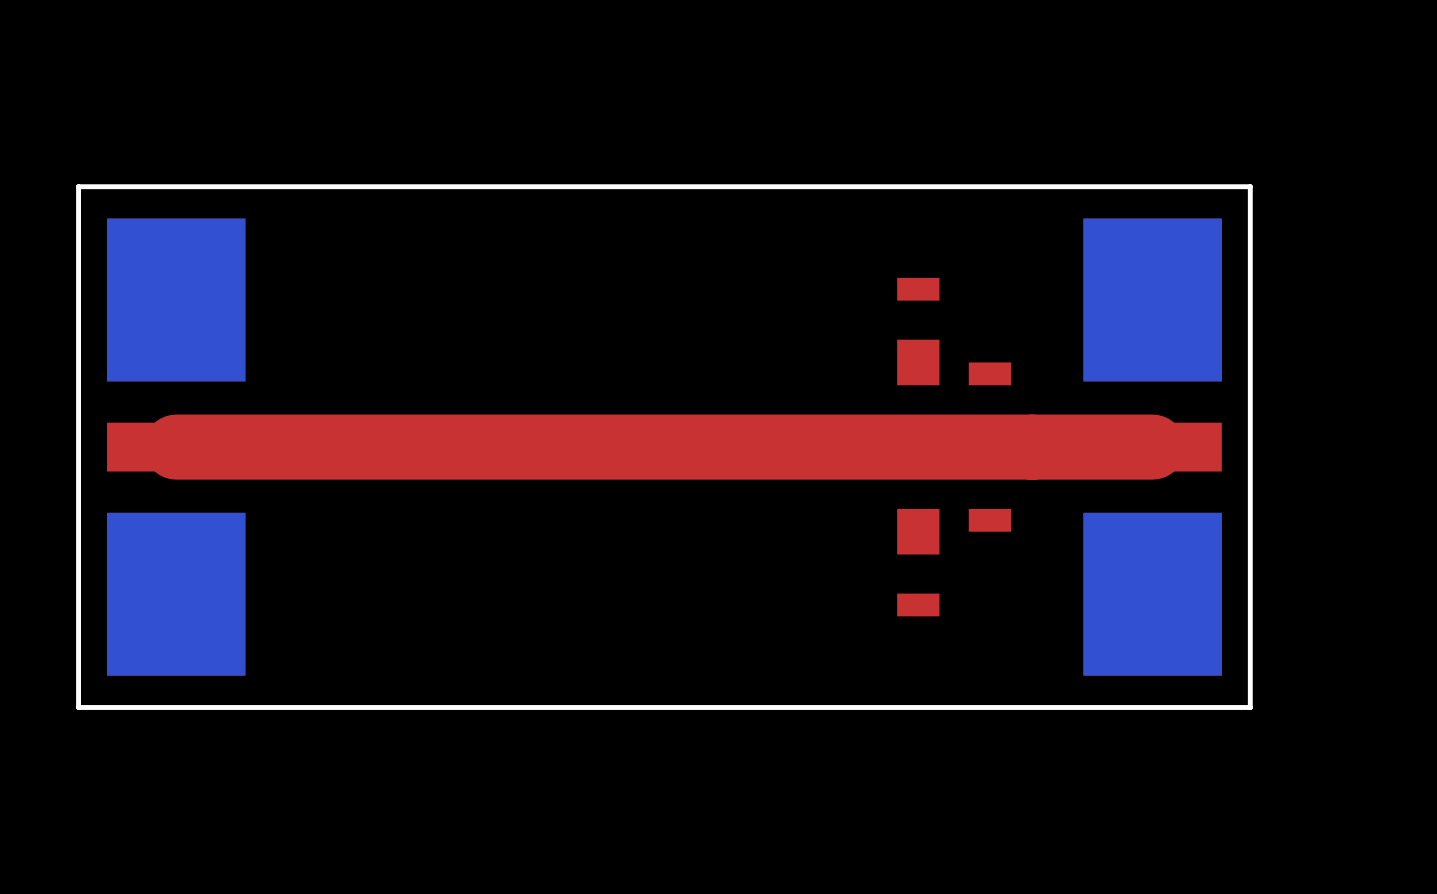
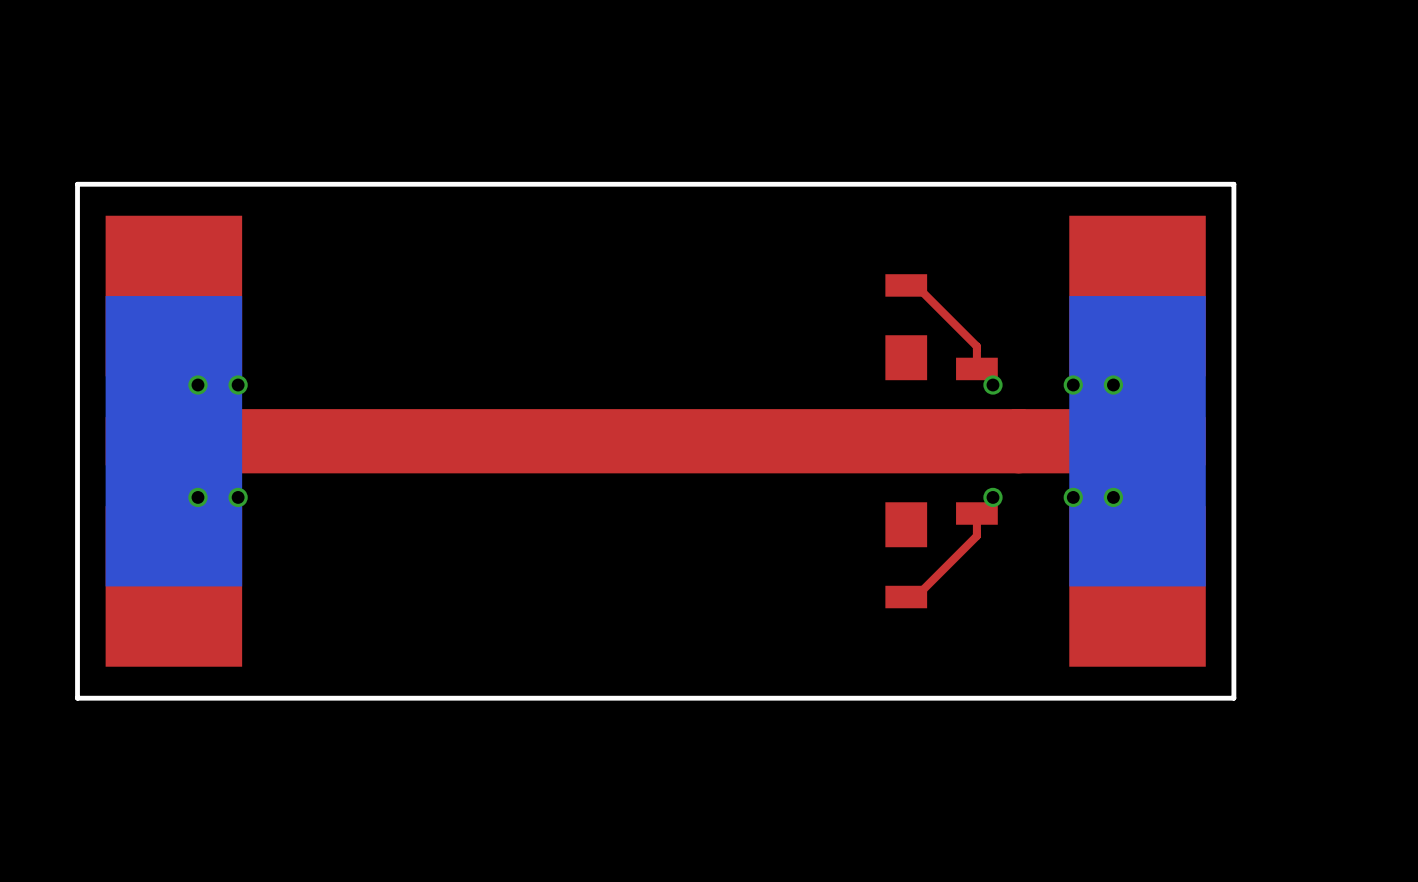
part footprint: [107, 218, 246, 676] -> [105, 215, 243, 667]
part footprint: [1083, 218, 1222, 676] -> [1069, 215, 1206, 667]
top track: none -> (906, 285) (915, 285) (976, 346) (976, 368)
via: none -> (197, 385)
via: none -> (238, 385)
via: none -> (992, 385)
via: none -> (1073, 385)
via: none -> (1113, 385)
via: none -> (197, 497)
via: none -> (238, 497)
via: none -> (992, 497)
via: none -> (1073, 497)
via: none -> (1113, 497)
top track: none -> (976, 513) (976, 535) (915, 597) (906, 597)

